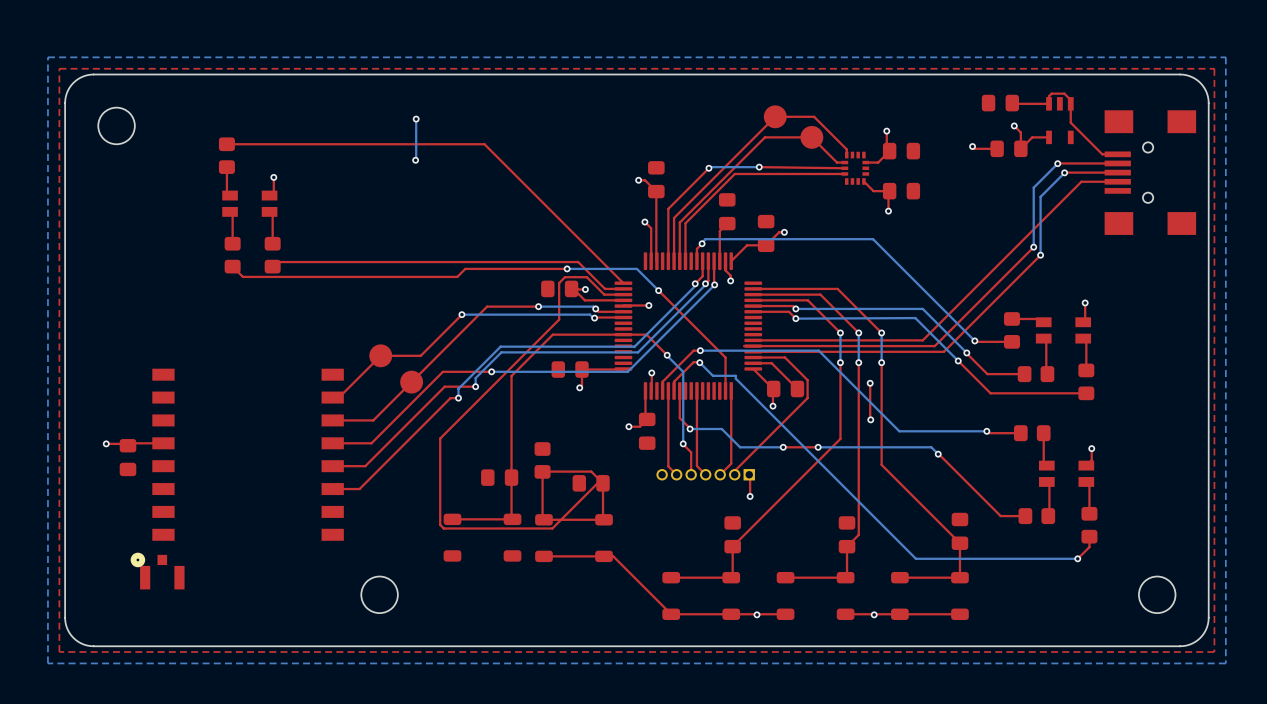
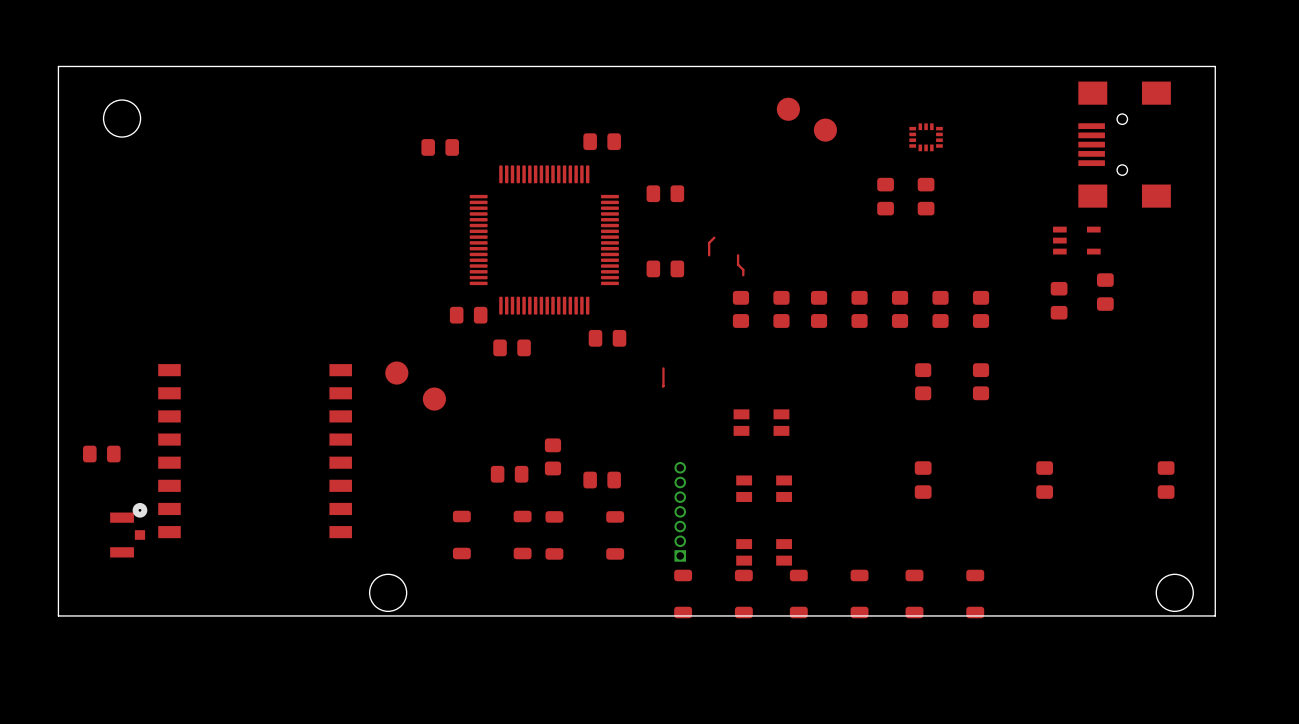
bottom zone outline: (1225, 57) (1225, 663) (47, 663) (47, 57) (1225, 57) -> none
top zone outline: (1214, 68) (1214, 652) (59, 652) (59, 68) (1214, 68) -> none
board edge: (1180, 74) (1189, 76) (1200, 82) (1207, 93) (1208, 103) (1208, 617) (1207, 627) (1200, 637) (1189, 644) (1180, 646) (93, 646) (81, 643) (69, 632) (65, 617) (65, 103) (67, 90) (73, 82) (84, 76) (93, 74) -> (1197, 66) (1215, 66) (1215, 615) (58, 615) (58, 66) (98, 66)
part: (1000, 103) -> none
top track: (1012, 103) (1049, 103) (1049, 96) (1051, 93) (1064, 93) (1070, 99) (1070, 122) (1102, 154) (1119, 154) -> none
bottom track: (416, 119) (415, 160) -> none
via: (416, 119) -> none
part rotation: 0° (1059, 120) -> 90° counterclockwise (1076, 240)
part position: (1059, 120) -> (1076, 240)
top track: (1014, 125) (1020, 132) (1020, 148) (1032, 137) (1049, 137) -> none
via: (1014, 125) -> none
top track: (886, 131) (886, 148) (889, 151) (878, 162) (865, 162) -> none
via: (886, 131) -> none
top track: (226, 144) (484, 144) (623, 283) -> none
top track: (972, 146) (974, 148) (997, 148) -> none
via: (972, 146) -> none
part: none -> (602, 141)
part: (1009, 148) -> none
part: (901, 151) -> none
part: none -> (440, 147)
part: (226, 155) -> none
top track: (846, 155) (846, 149) (814, 116) (775, 116) (674, 218) (674, 261) -> none
via: (415, 160) -> none
top track: (844, 162) (837, 162) (811, 137) (764, 137) (679, 222) (679, 261) -> none
bottom track: (1057, 163) (1033, 187) (1032, 247) (1034, 245) -> none
via: (1057, 163) -> none
top track: (1119, 163) (1056, 163) -> none
bottom track: (759, 167) (708, 168) -> none
via: (759, 167) -> none
top track: (708, 168) (668, 208) (668, 261) -> none
via: (708, 168) -> none
top track: (844, 168) (759, 168) -> none
part rotation: 0° (855, 168) -> 90° clockwise (926, 137)
part position: (855, 168) -> (926, 137)
top track: (226, 169) (226, 192) (230, 195) -> none
bottom track: (1064, 172) (1040, 196) (1040, 255) -> none
via: (1064, 172) -> none
top track: (1119, 172) (1064, 172) -> none
part position: (1150, 172) -> (1124, 144)
top track: (844, 173) (734, 173) (685, 223) (685, 261) -> none
top track: (273, 177) (273, 191) (269, 195) -> none
via: (273, 177) -> none
part rotation: 0° (656, 179) -> 90° clockwise (665, 193)
top track: (638, 180) (645, 180) (656, 191) (656, 261) -> none
via: (638, 180) -> none
top track: (863, 181) (873, 191) (889, 191) (888, 211) -> none
top track: (1119, 181) (1081, 181) (922, 340) (753, 340) -> none
part rotation: 0° (901, 191) -> 90° clockwise (926, 196)
part: (249, 203) -> none
part: none -> (885, 196)
top track: (230, 211) (232, 214) (232, 243) -> none
top track: (269, 211) (272, 215) (272, 243) -> none
part: (727, 211) -> none
via: (888, 211) -> none
top track: (644, 222) (651, 228) (651, 261) -> none
via: (644, 222) -> none
top track: (727, 223) (719, 231) (719, 261) -> none
top track: (784, 232) (779, 232) (766, 245) (747, 245) (731, 261) -> none
via: (784, 232) -> none
part: (766, 233) -> none
bottom track: (702, 242) (700, 243) (705, 239) (873, 239) (974, 340) -> none
via: (702, 243) -> none
top track: (1033, 247) (934, 346) (744, 346) -> none
via: (1033, 247) -> none
part: (232, 255) -> none
part: (272, 255) -> none
top track: (1040, 255) (943, 351) (753, 351) -> none
via: (1040, 255) -> none
top track: (702, 261) (702, 276) (695, 283) -> none
top track: (708, 261) (708, 280) (705, 283) -> none
top track: (714, 261) (714, 284) -> none
top track: (232, 266) (242, 276) (457, 276) (465, 268) (567, 268) -> none
top track: (272, 266) (277, 262) (578, 262) (605, 288) (623, 288) -> none
bottom track: (567, 268) (636, 268) (658, 290) -> none
via: (567, 268) -> none
part: none -> (665, 268)
via: (730, 280) -> none
bottom track: (695, 283) (695, 286) (634, 346) (500, 346) (458, 388) (458, 398) -> none
via: (695, 283) -> none
bottom track: (705, 283) (638, 352) (501, 352) (475, 378) (475, 386) -> none
via: (705, 283) -> none
bottom track: (714, 284) (627, 371) (491, 371) -> none
via: (714, 284) -> none
part: (559, 288) -> none
top track: (753, 288) (837, 288) (881, 332) -> none
top track: (585, 289) (572, 289) (571, 288) (573, 288) (584, 300) (623, 300) -> none
via: (585, 289) -> none
top track: (658, 290) (725, 357) (725, 390) -> none
via: (658, 290) -> none
top track: (623, 294) (604, 294) (586, 277) (565, 277) (559, 283) (559, 319) (440, 438) (440, 524) (443, 528) (552, 528) (602, 478) -> none
top track: (753, 294) (820, 294) (858, 332) -> none
part: none -> (1105, 292)
top track: (753, 300) (807, 300) (840, 332) -> none
top track: (1085, 302) (1085, 320) (1083, 322) -> none
via: (1085, 302) -> none
top track: (648, 305) (623, 306) -> none
via: (648, 305) -> none
top track: (538, 306) (487, 306) (373, 420) (332, 420) -> none
bottom track: (538, 306) (593, 306) (595, 308) -> none
via: (538, 306) -> none
top track: (753, 306) (793, 306) (795, 308) -> none
part: none -> (1059, 300)
top track: (595, 308) (598, 311) (623, 311) -> none
via: (595, 308) -> none
bottom track: (795, 308) (922, 308) (966, 352) -> none
via: (795, 308) -> none
top track: (753, 311) (789, 311) (795, 318) -> none
top track: (461, 314) (420, 355) (380, 355) (338, 397) (332, 397) -> none
bottom track: (461, 314) (590, 314) (594, 319) (593, 318) -> none
via: (461, 314) -> none
part: none -> (740, 309)
part: none -> (781, 309)
part: none -> (819, 309)
part: none -> (859, 309)
part: none -> (900, 309)
part: none -> (940, 309)
part: none -> (981, 309)
top track: (623, 317) (594, 318) -> none
via: (594, 318) -> none
via: (795, 318) -> none
bottom track: (796, 318) (915, 318) (958, 360) -> none
top track: (1012, 318) (1040, 318) (1043, 322) -> none
part: none -> (468, 315)
part position: (688, 326) -> (544, 240)
part: (1012, 330) -> none
part: (1063, 330) -> none
bottom track: (858, 331) (858, 362) -> none
bottom track: (840, 332) (840, 362) -> none
via: (840, 332) -> none
via: (858, 332) -> none
bottom track: (881, 332) (881, 362) -> none
via: (881, 332) -> none
top track: (1043, 338) (1046, 341) (1046, 370) -> none
top track: (1083, 338) (1086, 341) (1086, 370) -> none
via: (974, 340) -> none
top track: (974, 341) (1012, 341) -> none
part: none -> (607, 338)
top track: (700, 350) (693, 350) (662, 381) (662, 390) -> none
bottom track: (700, 350) (818, 350) (899, 431) (986, 431) -> none
via: (700, 350) -> none
part: none -> (512, 347)
top track: (966, 352) (987, 374) (1024, 374) -> none
via: (966, 352) -> none
part: (380, 355) -> none
bottom track: (666, 355) (683, 371) (683, 443) -> none
top track: (667, 355) (646, 334) (552, 334) (511, 375) (512, 519) (452, 519) -> none
via: (667, 355) -> none
top track: (753, 357) (784, 357) (807, 380) (807, 398) (734, 470) (734, 474) -> none
top track: (958, 360) (990, 393) (1086, 393) -> none
via: (958, 360) -> none
top track: (699, 362) (693, 362) (674, 381) (674, 390) -> none
bottom track: (699, 362) (712, 375) (735, 375) (735, 378) (915, 558) (1077, 558) -> none
via: (699, 362) -> none
top track: (840, 362) (840, 438) (732, 546) (732, 576) (671, 577) -> none
via: (840, 362) -> none
top track: (858, 362) (858, 534) (847, 546) (847, 576) (785, 577) -> none
via: (858, 362) -> none
via: (881, 362) -> none
top track: (882, 362) (881, 464) (959, 543) (959, 577) (899, 577) -> none
top track: (752, 363) (771, 363) (797, 388) -> none
top track: (623, 368) (582, 369) (582, 385) (579, 387) -> none
top track: (753, 368) (773, 388) (772, 406) -> none
part: (570, 369) -> none
top track: (491, 371) (442, 371) (371, 443) (332, 443) -> none
via: (491, 371) -> none
via: (651, 372) -> none
part: (1036, 374) -> none
part: none -> (396, 373)
part: (1086, 381) -> none
part: (411, 382) -> none
top track: (870, 383) (870, 419) -> none
via: (870, 383) -> none
top track: (475, 386) (444, 386) (365, 466) (332, 466) -> none
via: (475, 386) -> none
part: none -> (923, 381)
part: none -> (981, 381)
via: (579, 387) -> none
part: (785, 388) -> none
top track: (645, 390) (645, 417) (647, 419) (639, 426) (628, 426) -> none
top track: (668, 390) (668, 466) (676, 474) -> none
top track: (679, 390) (679, 418) (690, 428) -> none
top track: (696, 390) (696, 466) (705, 474) -> none
top track: (731, 390) (731, 463) (720, 474) -> none
top track: (458, 398) (450, 398) (359, 489) (332, 489) -> none
via: (458, 398) -> none
part: none -> (434, 399)
via: (772, 406) -> none
via: (870, 419) -> none
via: (628, 426) -> none
part: none -> (761, 422)
bottom track: (690, 429) (721, 429) (740, 447) (783, 447) -> none
via: (690, 429) -> none
part: (647, 431) -> none
top track: (986, 431) (988, 433) (1020, 433) -> none
via: (986, 431) -> none
part: (1032, 433) -> none
top track: (1043, 439) (1043, 462) (1046, 465) -> none
via: (106, 443) -> none
top track: (163, 443) (132, 443) (129, 445) (126, 443) (106, 443) -> none
via: (683, 443) -> none
top track: (683, 444) (691, 452) (691, 474) -> none
via: (783, 447) -> none
top track: (818, 447) (783, 447) -> none
bottom track: (818, 447) (931, 447) (938, 454) -> none
via: (818, 447) -> none
top track: (1091, 448) (1091, 460) (1086, 465) -> none
via: (1091, 448) -> none
top track: (938, 454) (1000, 516) (1025, 516) -> none
via: (938, 454) -> none
part rotation: 0° (128, 457) -> 90° clockwise (101, 454)
part position: (128, 457) -> (101, 454)
top track: (591, 471) (603, 483) (604, 519) (542, 518) (542, 471) (591, 471) -> none
part: (1066, 473) -> none
part rotation: 0° (705, 474) -> 90° clockwise (680, 511)
top track: (749, 474) (750, 496) -> none
top track: (1046, 481) (1049, 484) (1049, 513) -> none
top track: (1086, 481) (1089, 485) (1089, 513) -> none
part: none -> (923, 480)
part: none -> (1044, 480)
part: none -> (1166, 480)
part: none -> (764, 488)
via: (750, 496) -> none
part: (1036, 516) -> none
part: (1089, 525) -> none
part: (959, 531) -> none
part: (732, 534) -> none
part: (847, 534) -> none
top track: (1089, 536) (1089, 547) (1077, 558) -> none
part: none -> (764, 552)
top track: (543, 556) (613, 556) (671, 614) (785, 614) -> none
via: (1077, 558) -> none
part rotation: 0° (157, 571) -> 90° clockwise (128, 530)
part position: (157, 571) -> (128, 530)
via: (756, 614) -> none
via: (874, 614) -> none
top track: (959, 614) (845, 614) -> none

